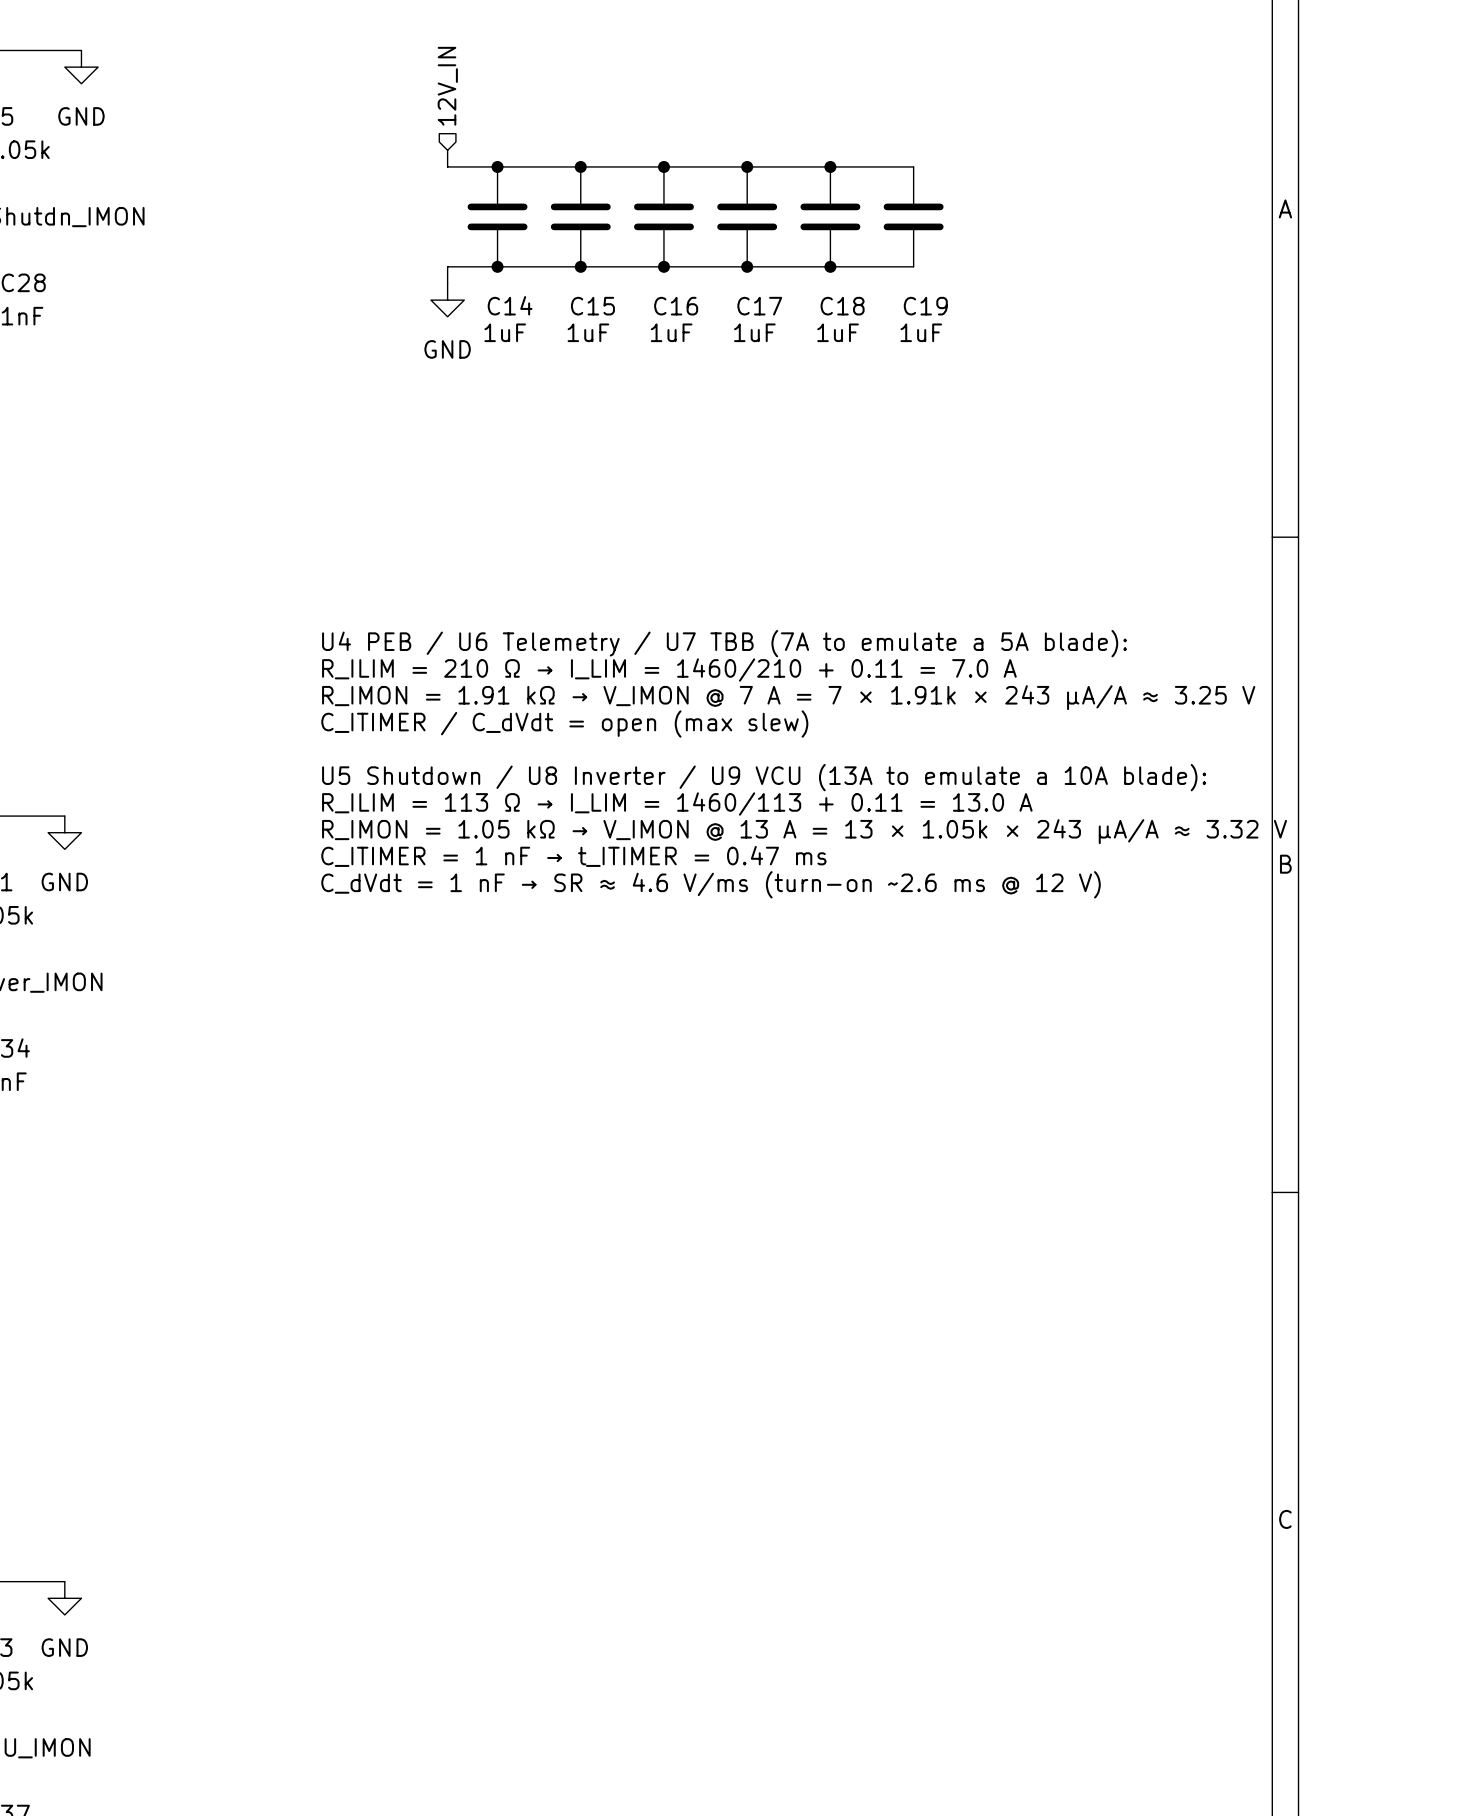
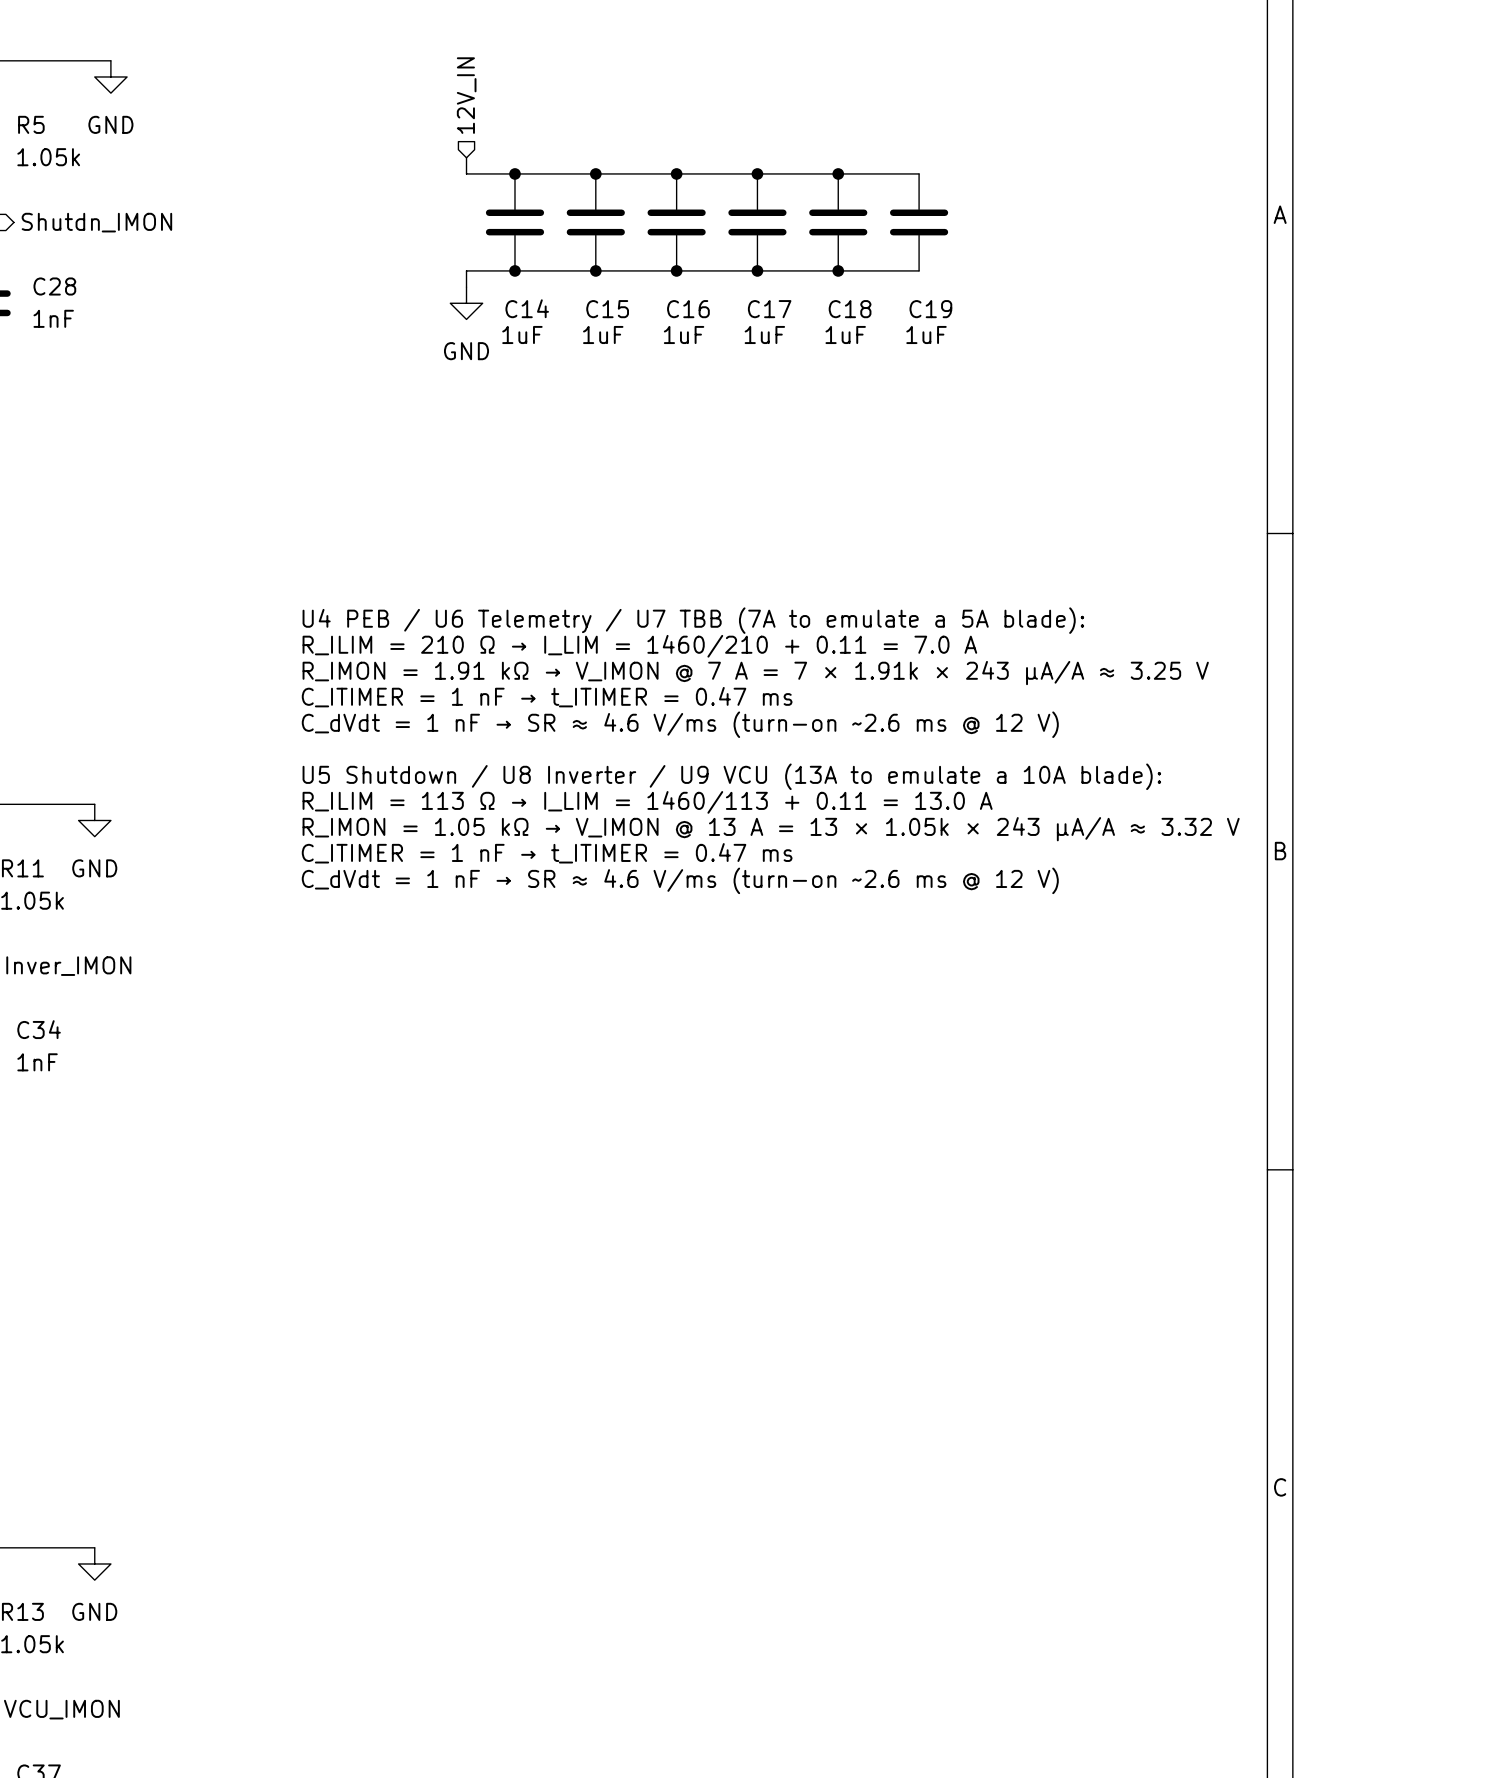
text position: U4 PEB / U6 Telemetry / U7 TBB (7A to emulate a 5A blade): (724, 643) -> U4 PEB / U6 Telemetry / U7 TBB (7A to emulate a 5A blade): (693, 620)
text position: R_ILIM = 210 Ω → I_LIM = 1460/210 + 0.11 = 7.0 A (669, 670) -> R_ILIM = 210 Ω → I_LIM = 1460/210 + 0.11 = 7.0 A (639, 646)
text position: R_IMON = 1.91 kΩ → V_IMON @ 7 A = 7 × 1.91k × 243 µA/A ≈ 3.25 V (788, 697) -> R_IMON = 1.91 kΩ → V_IMON @ 7 A = 7 × 1.91k × 243 µA/A ≈ 3.25 V (755, 673)
text: none -> C_ITIMER = 1 nF → t_ITIMER = 0.47 ms (547, 697)
text: C_ITIMER / C_dVdt = open (max slew) (564, 724) -> none
text: none -> C_dVdt = 1 nF → SR ≈ 4.6 V/ms (turn-on ~2.6 ms @ 12 V) (680, 724)
text position: U5 Shutdown / U8 Inverter / U9 VCU (13A to emulate a 10A blade): (764, 777) -> U5 Shutdown / U8 Inverter / U9 VCU (13A to emulate a 10A blade): (731, 776)
text position: R_ILIM = 113 Ω → I_LIM = 1460/113 + 0.11 = 13.0 A (677, 804) -> R_ILIM = 113 Ω → I_LIM = 1460/113 + 0.11 = 13.0 A (647, 802)
text position: R_IMON = 1.05 kΩ → V_IMON @ 13 A = 13 × 1.05k × 243 µA/A ≈ 3.32 V (804, 831) -> R_IMON = 1.05 kΩ → V_IMON @ 13 A = 13 × 1.05k × 243 µA/A ≈ 3.32 V (771, 829)
text position: C_ITIMER = 1 nF → t_ITIMER = 0.47 ms (573, 856) -> C_ITIMER = 1 nF → t_ITIMER = 0.47 ms (547, 853)
text position: C_dVdt = 1 nF → SR ≈ 4.6 V/ms (turn-on ~2.6 ms @ 12 V) (711, 884) -> C_dVdt = 1 nF → SR ≈ 4.6 V/ms (turn-on ~2.6 ms @ 12 V) (680, 880)

